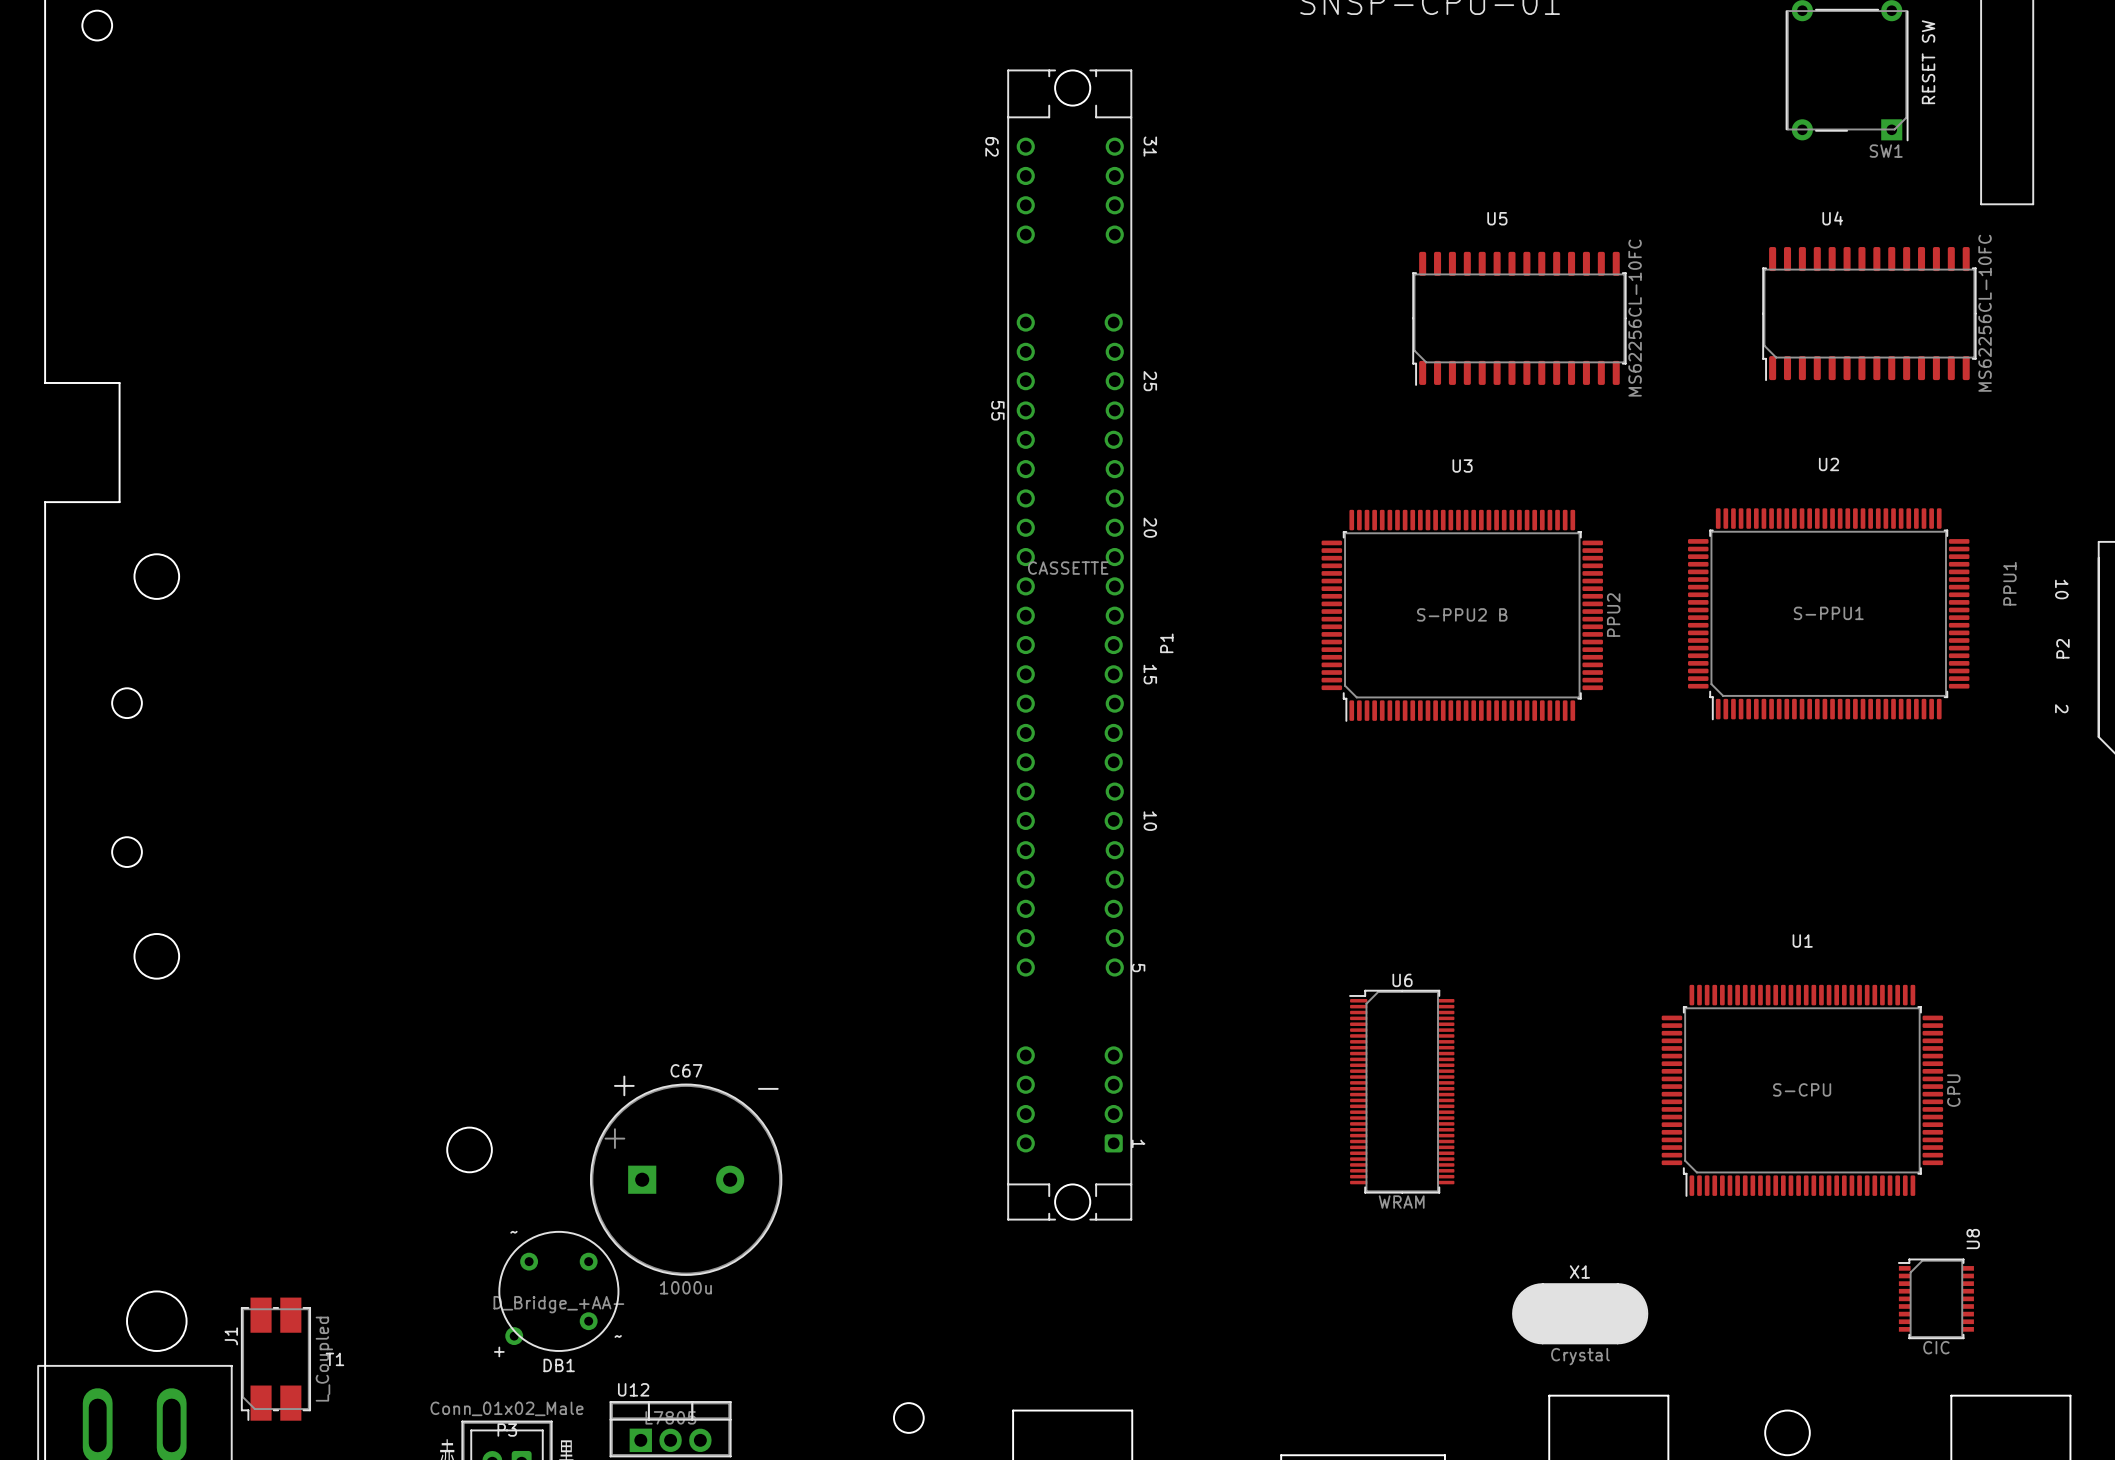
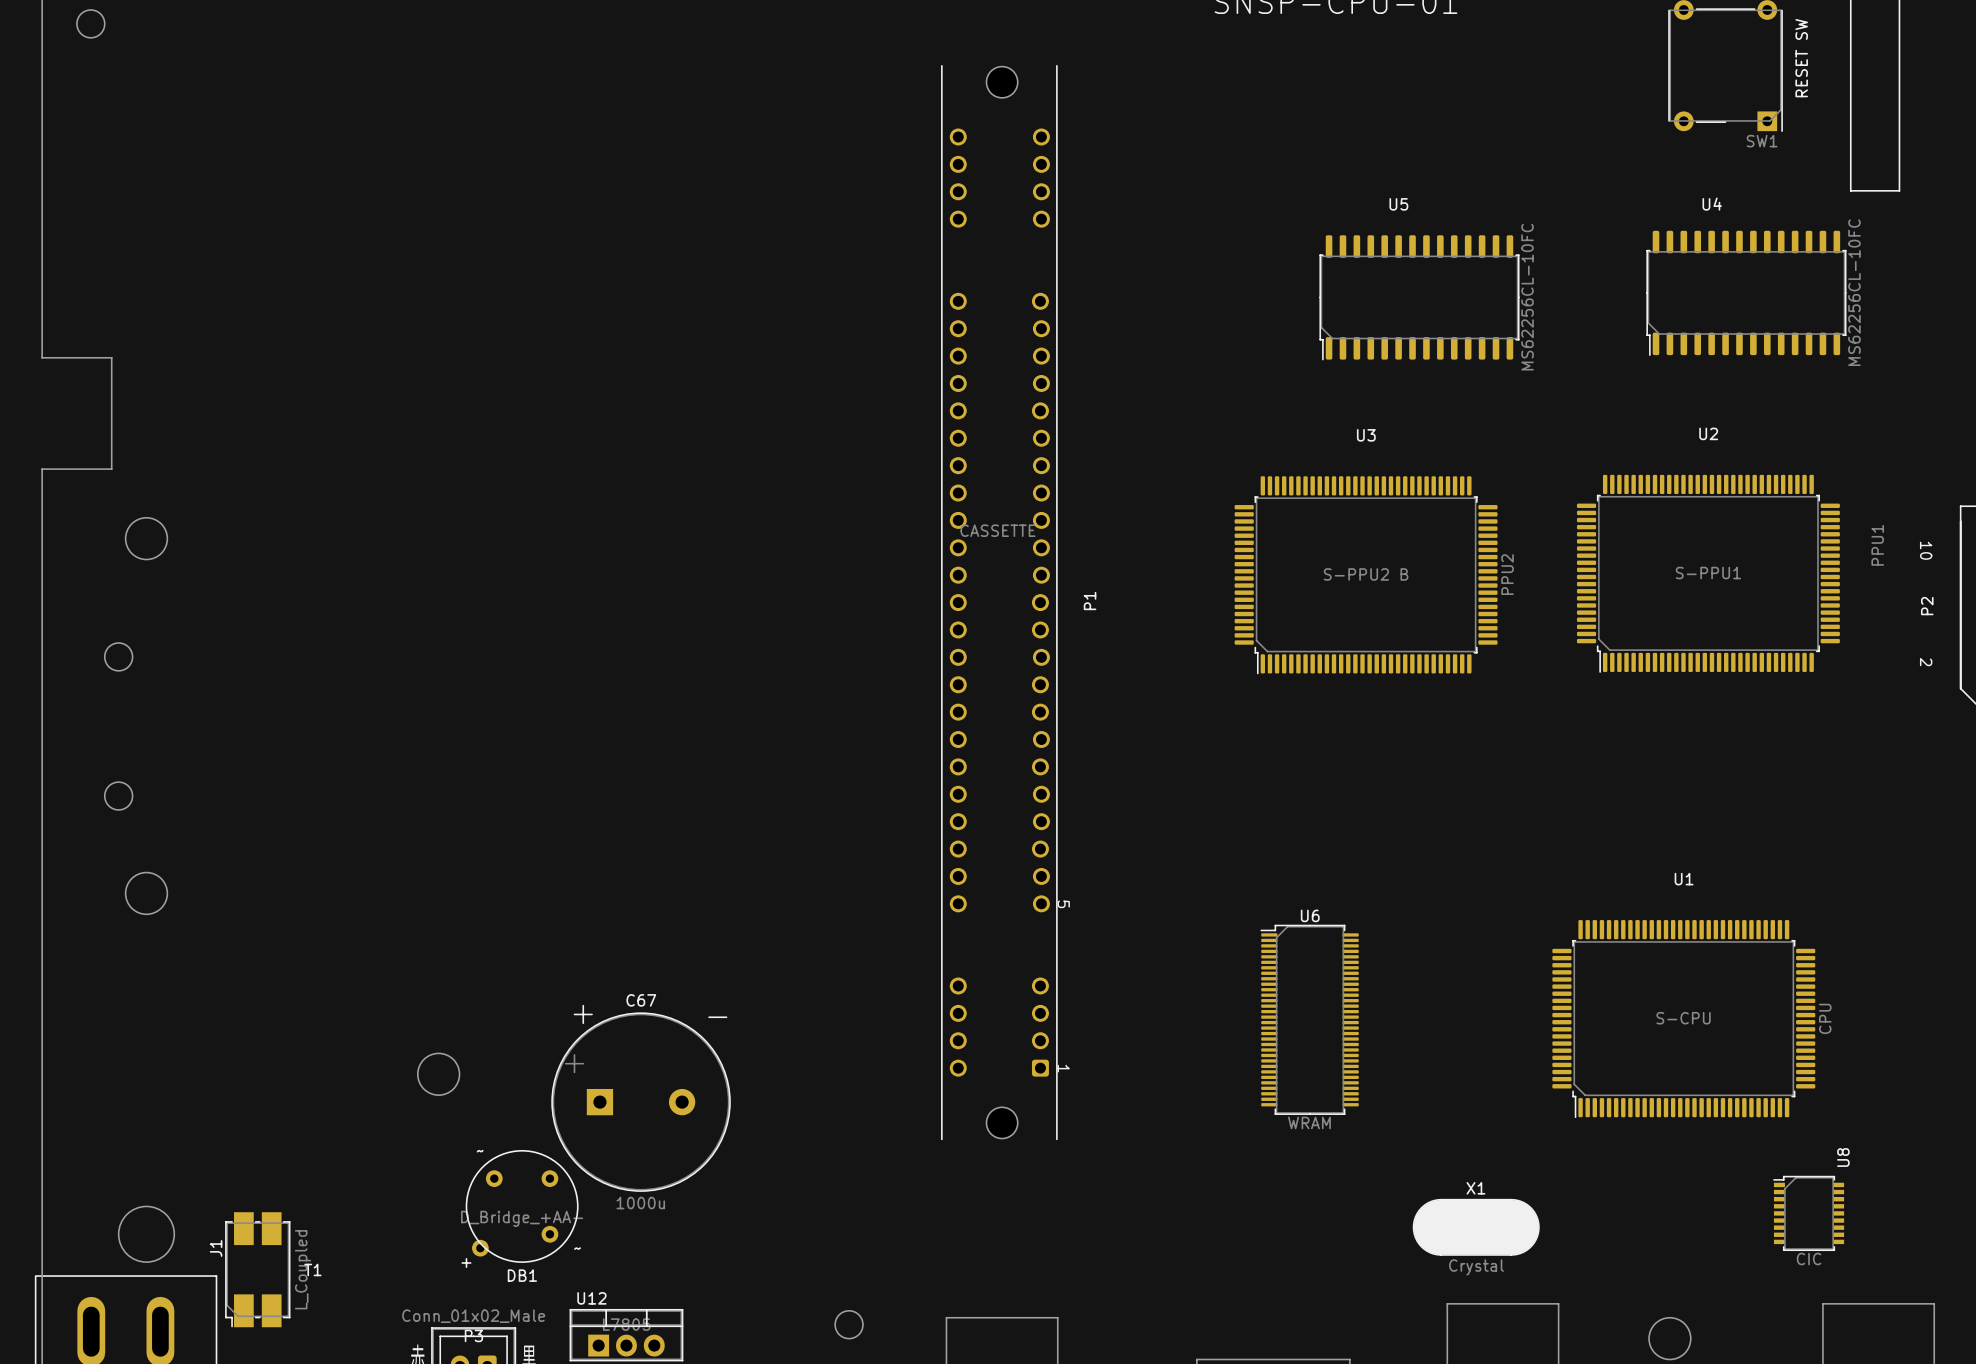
P1 footprint: [1007, 69, 1132, 1221] -> [941, 65, 1058, 1140]

